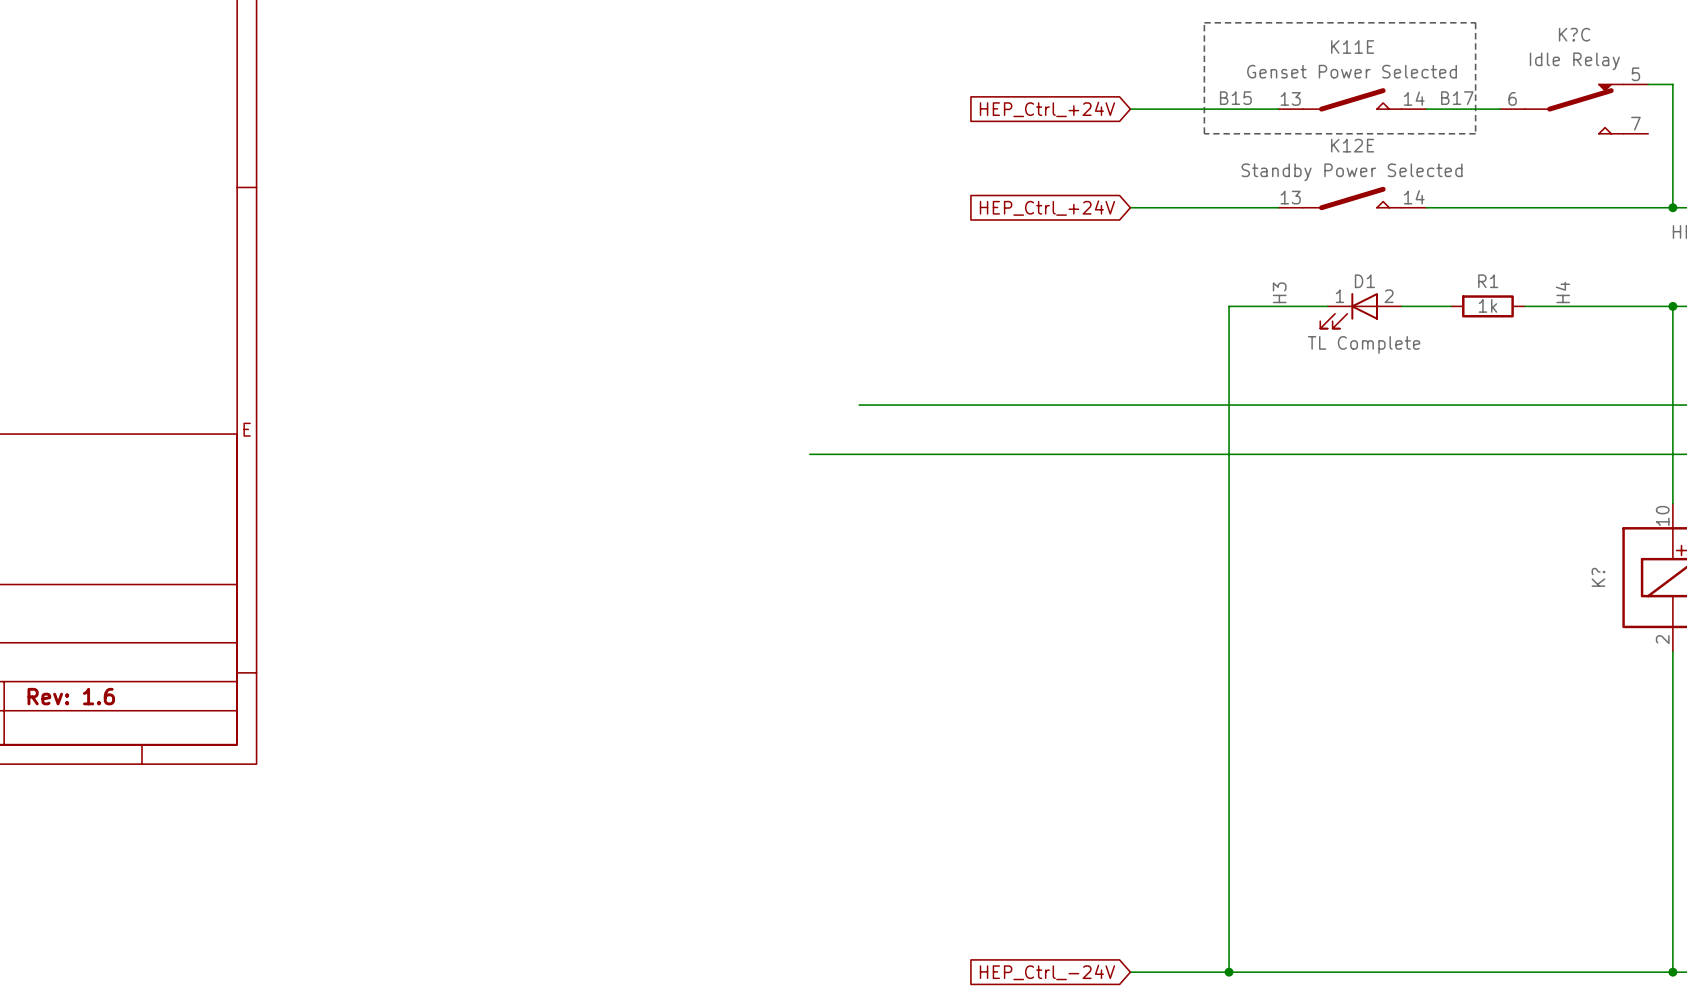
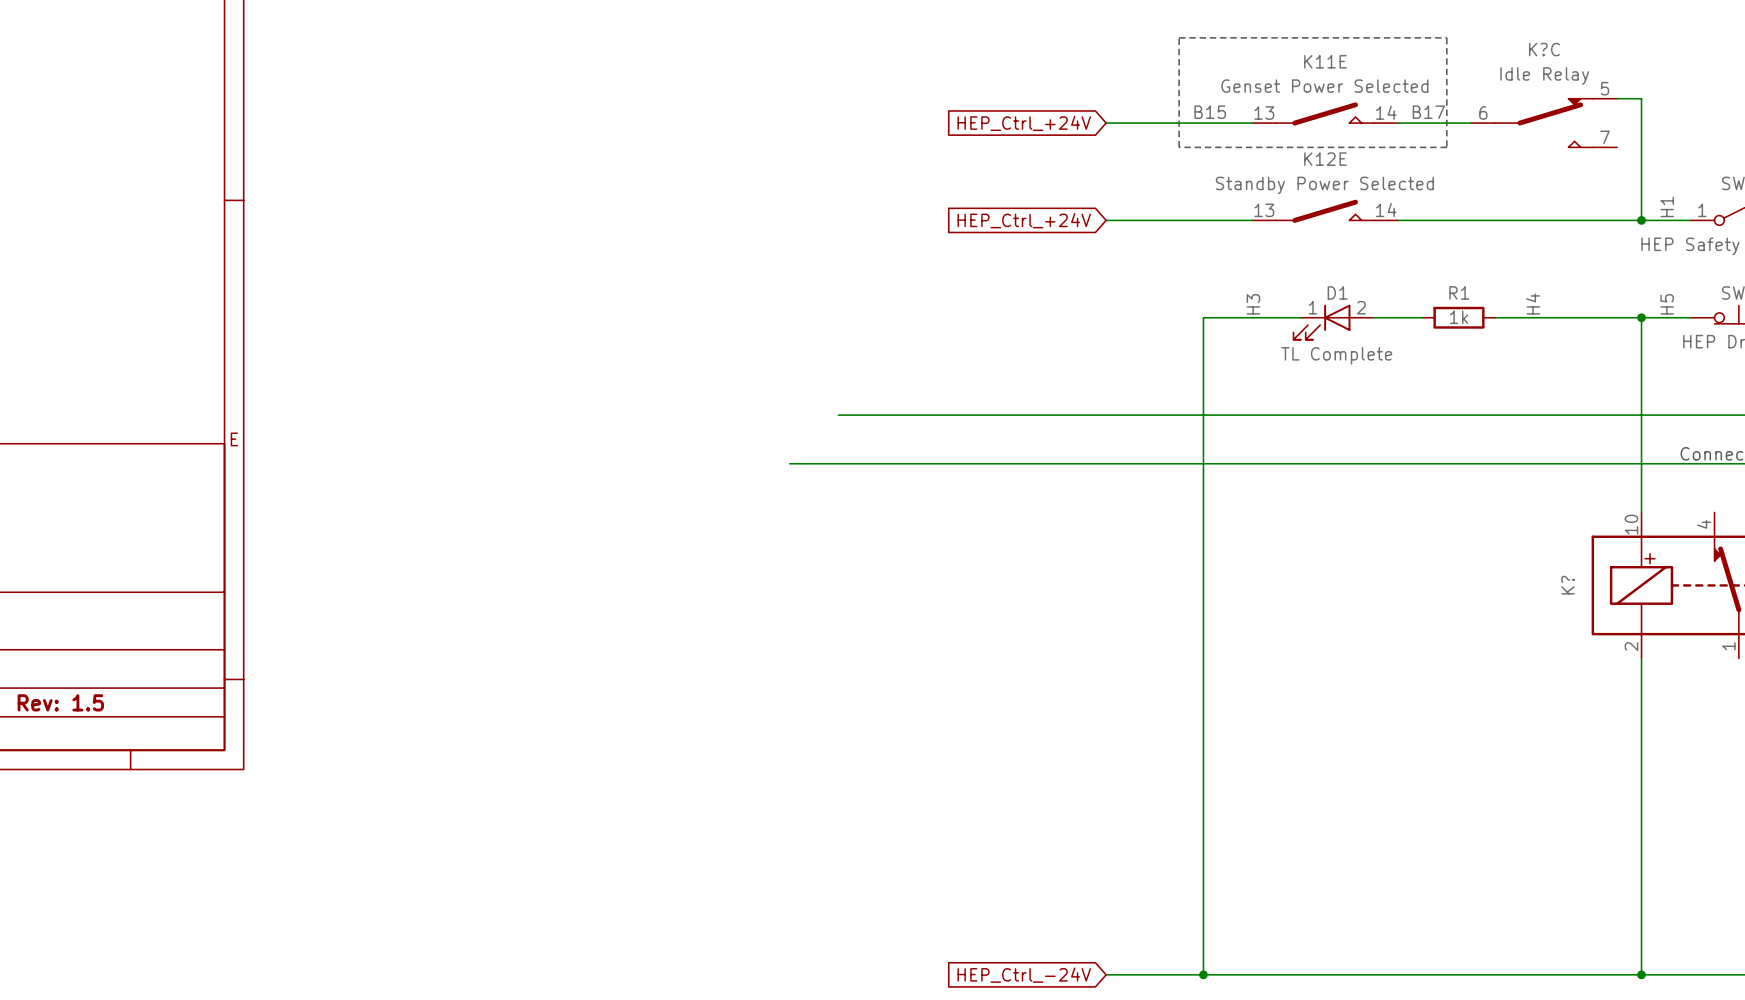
title block: Rev: 1.6 (71, 696) -> Rev: 1.5 (60, 702)

